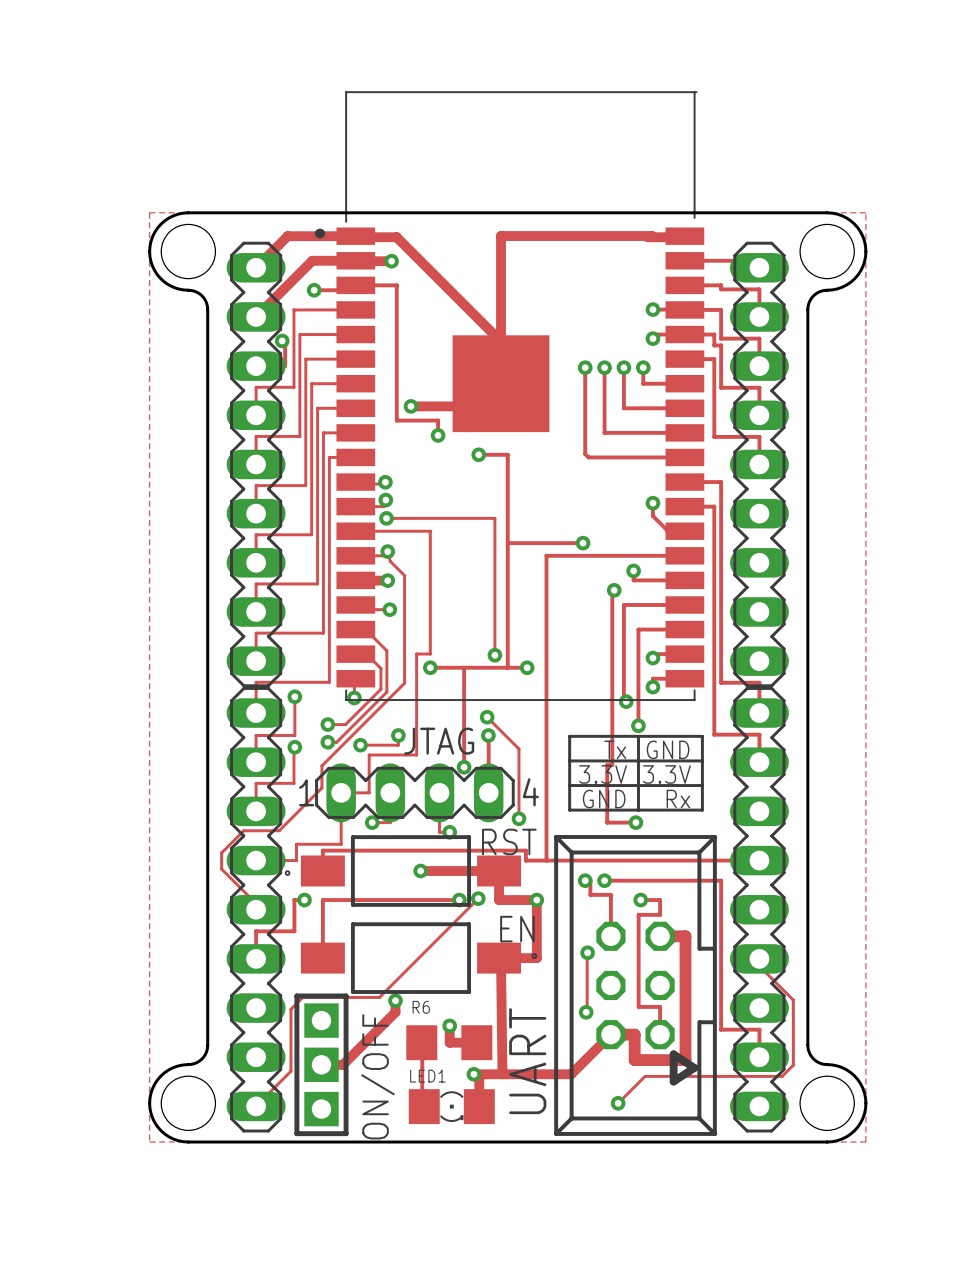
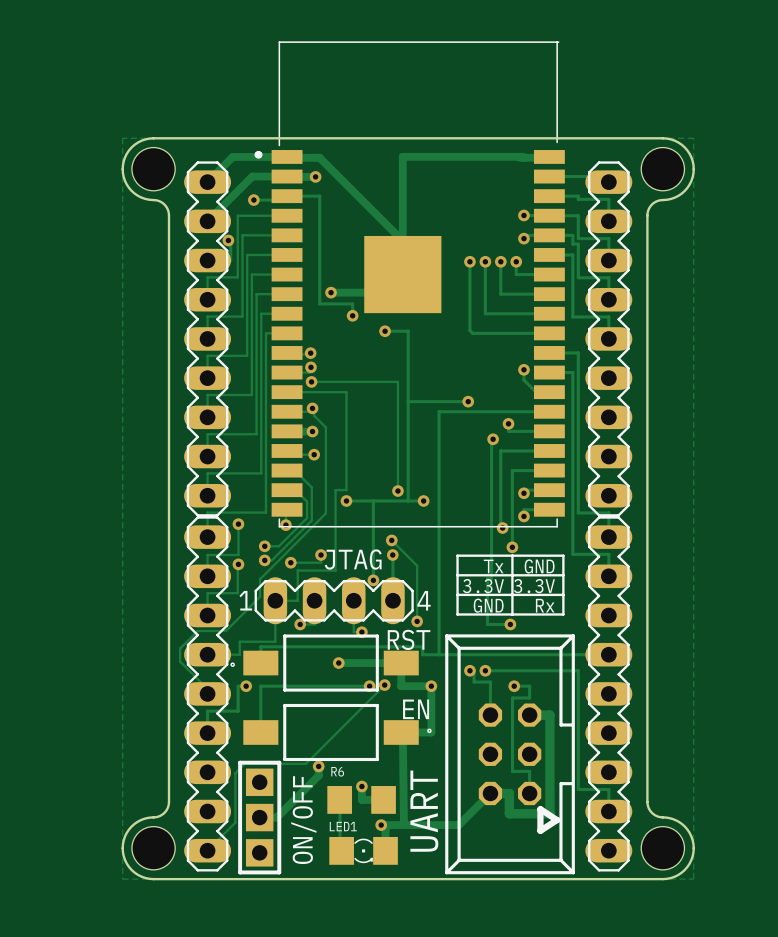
track: (587, 952) (586, 1012) -> none
via: (587, 952) -> none
track: (759, 958) (759, 966) (793, 1000) (793, 1065) (782, 1076) (645, 1076) (618, 1103) -> none
via: (586, 1012) -> none
via: (618, 1103) -> none

